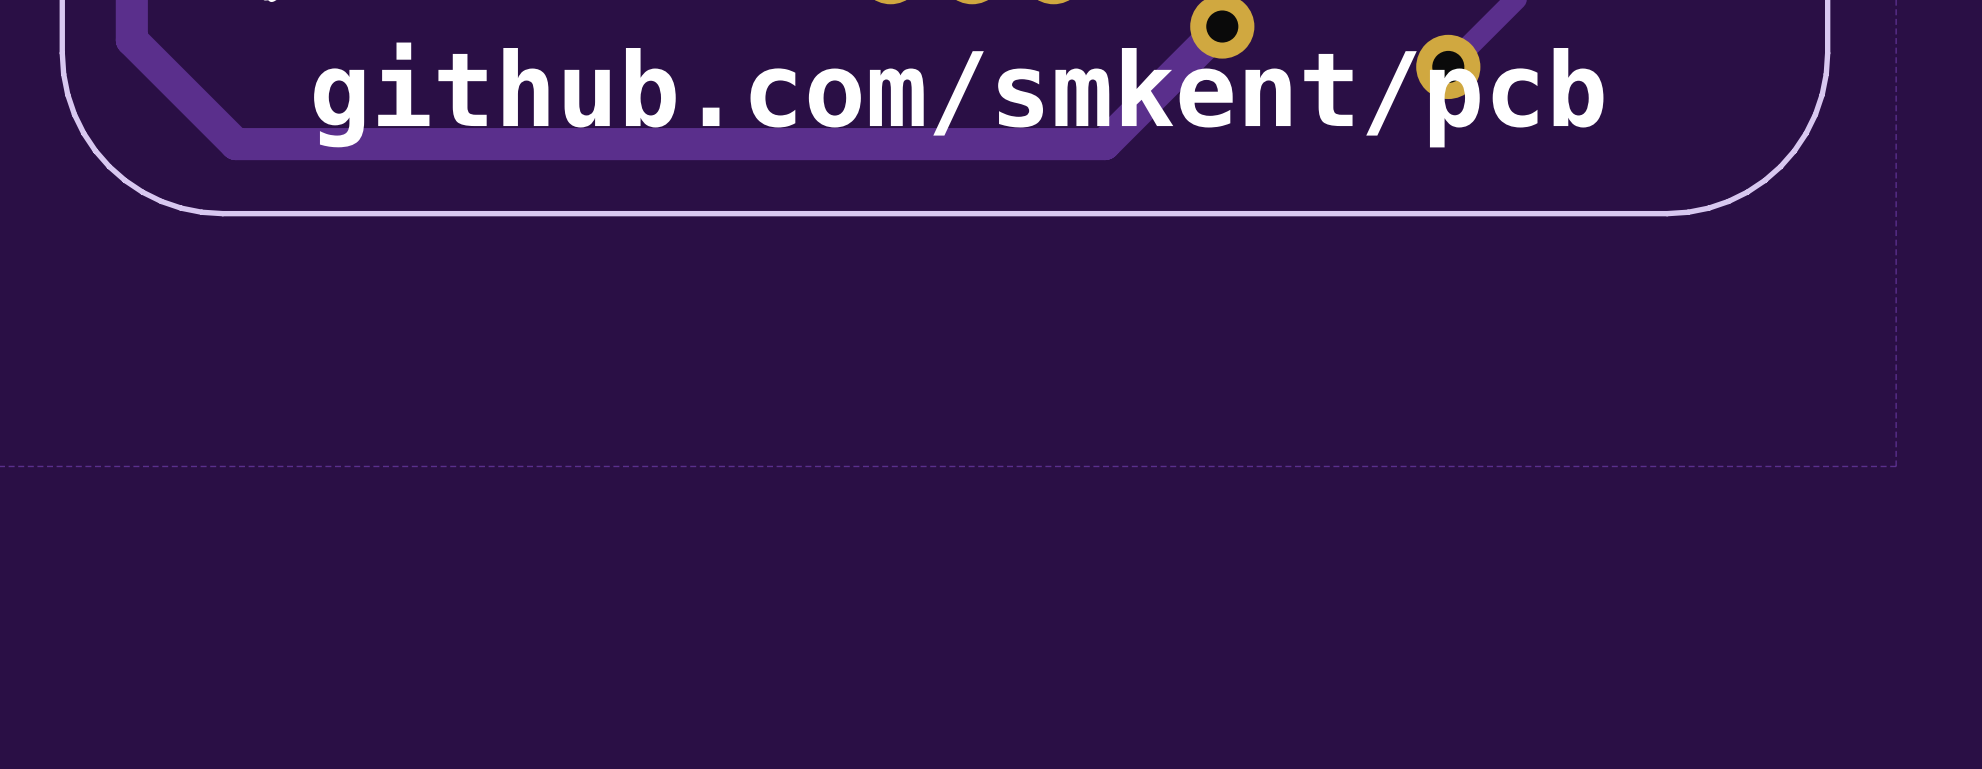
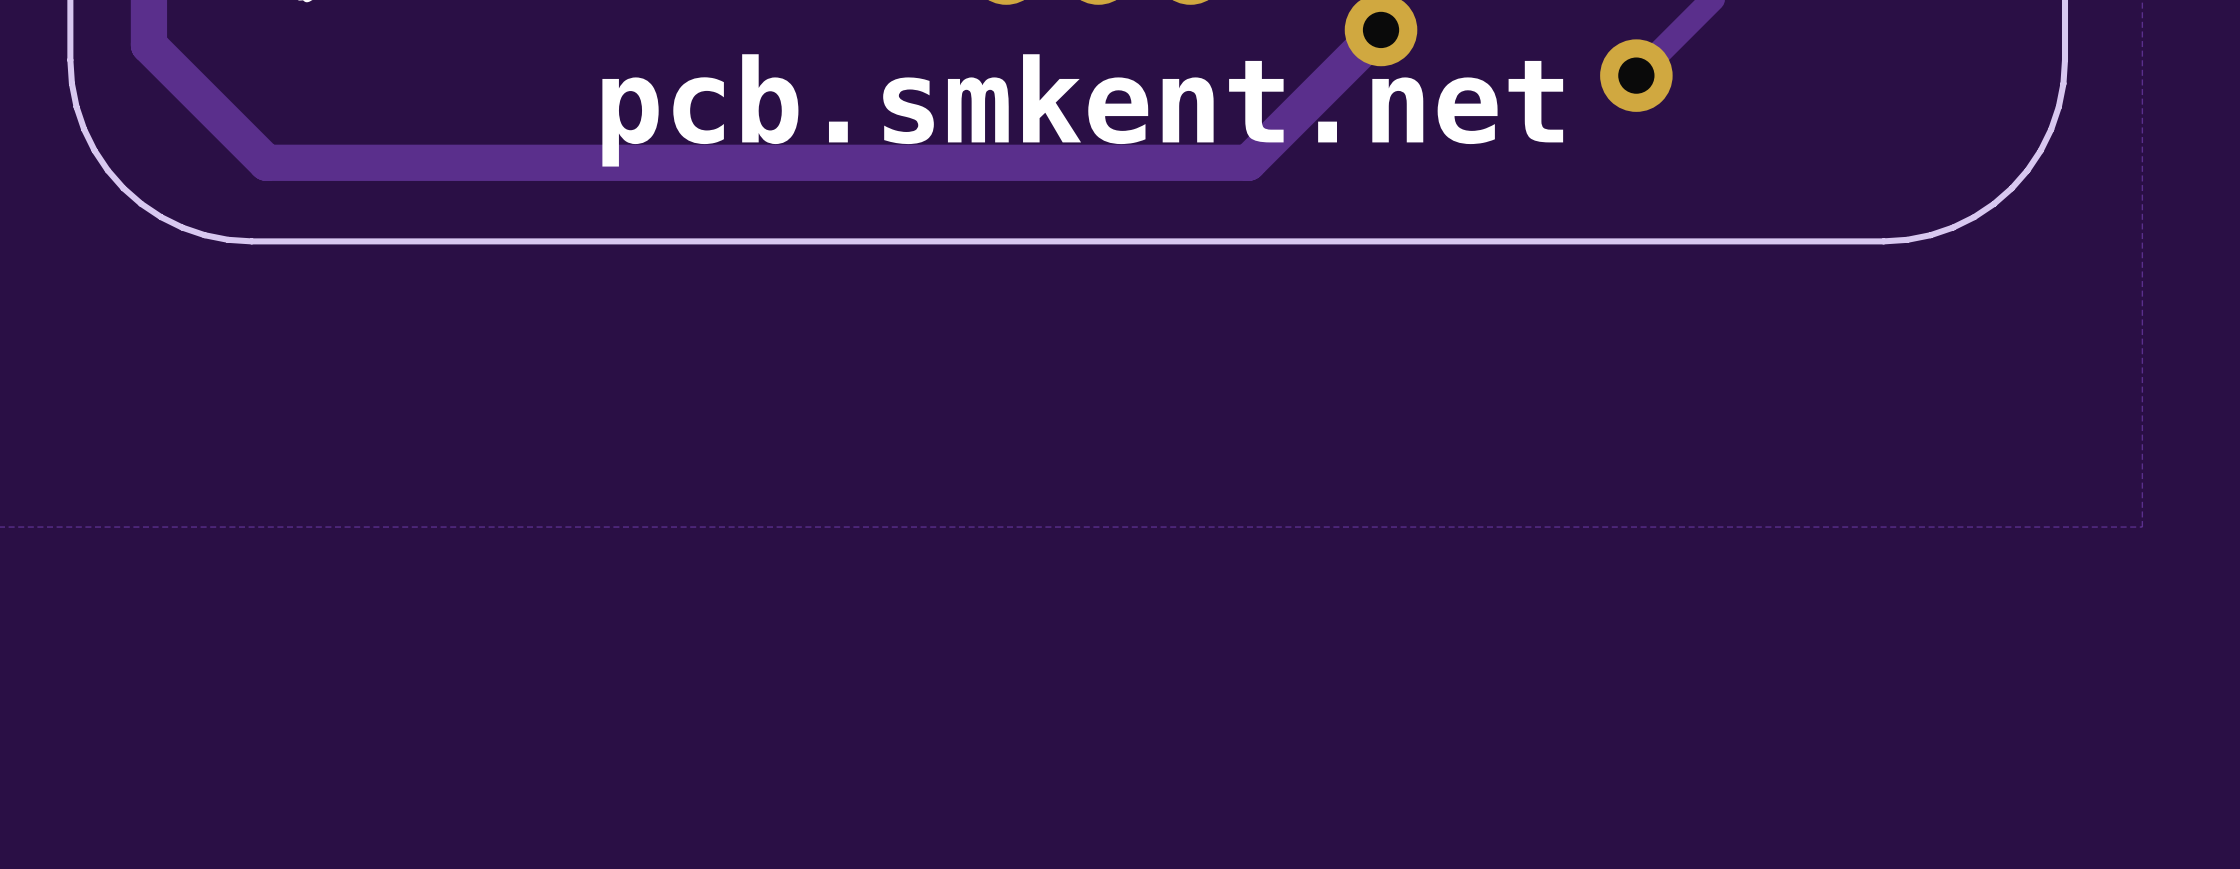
text: github.com/smkent/pcb (958, 94) -> pcb.smkent.net (1082, 110)

